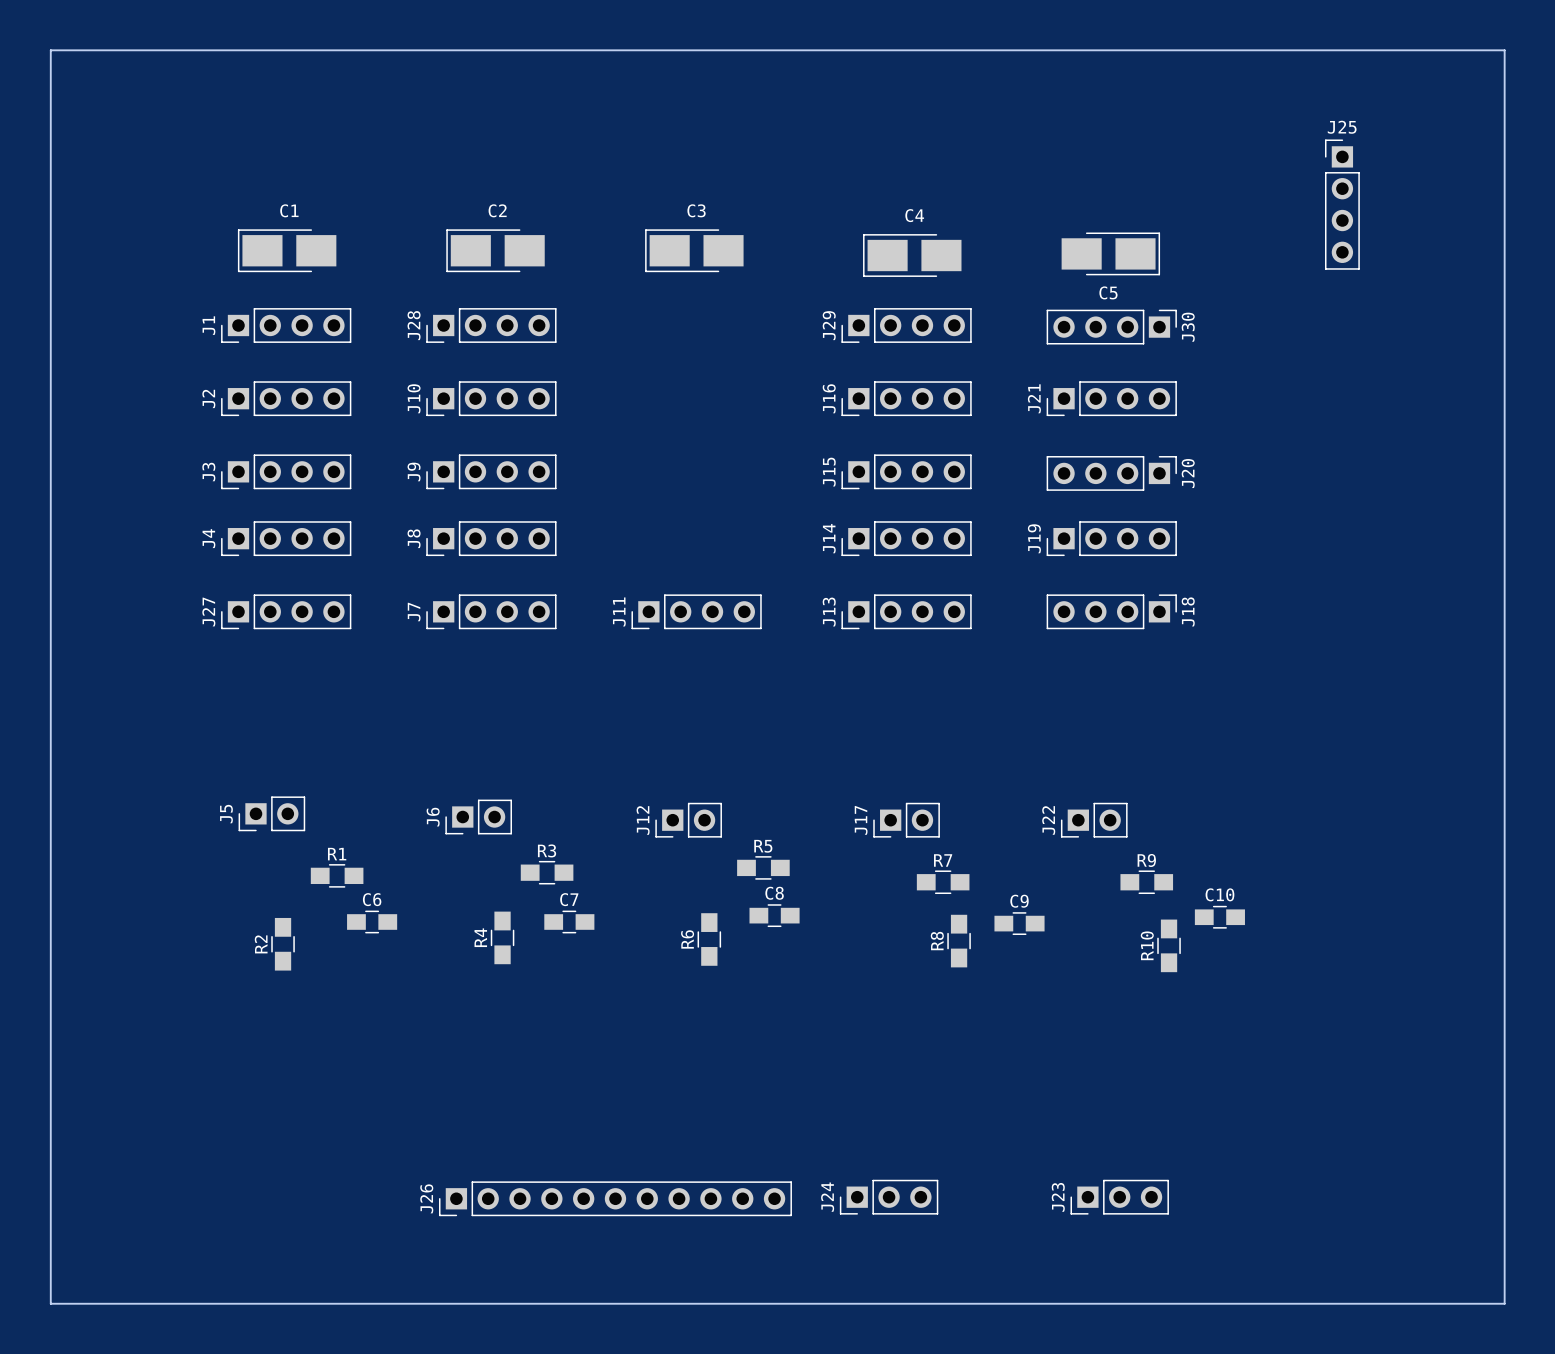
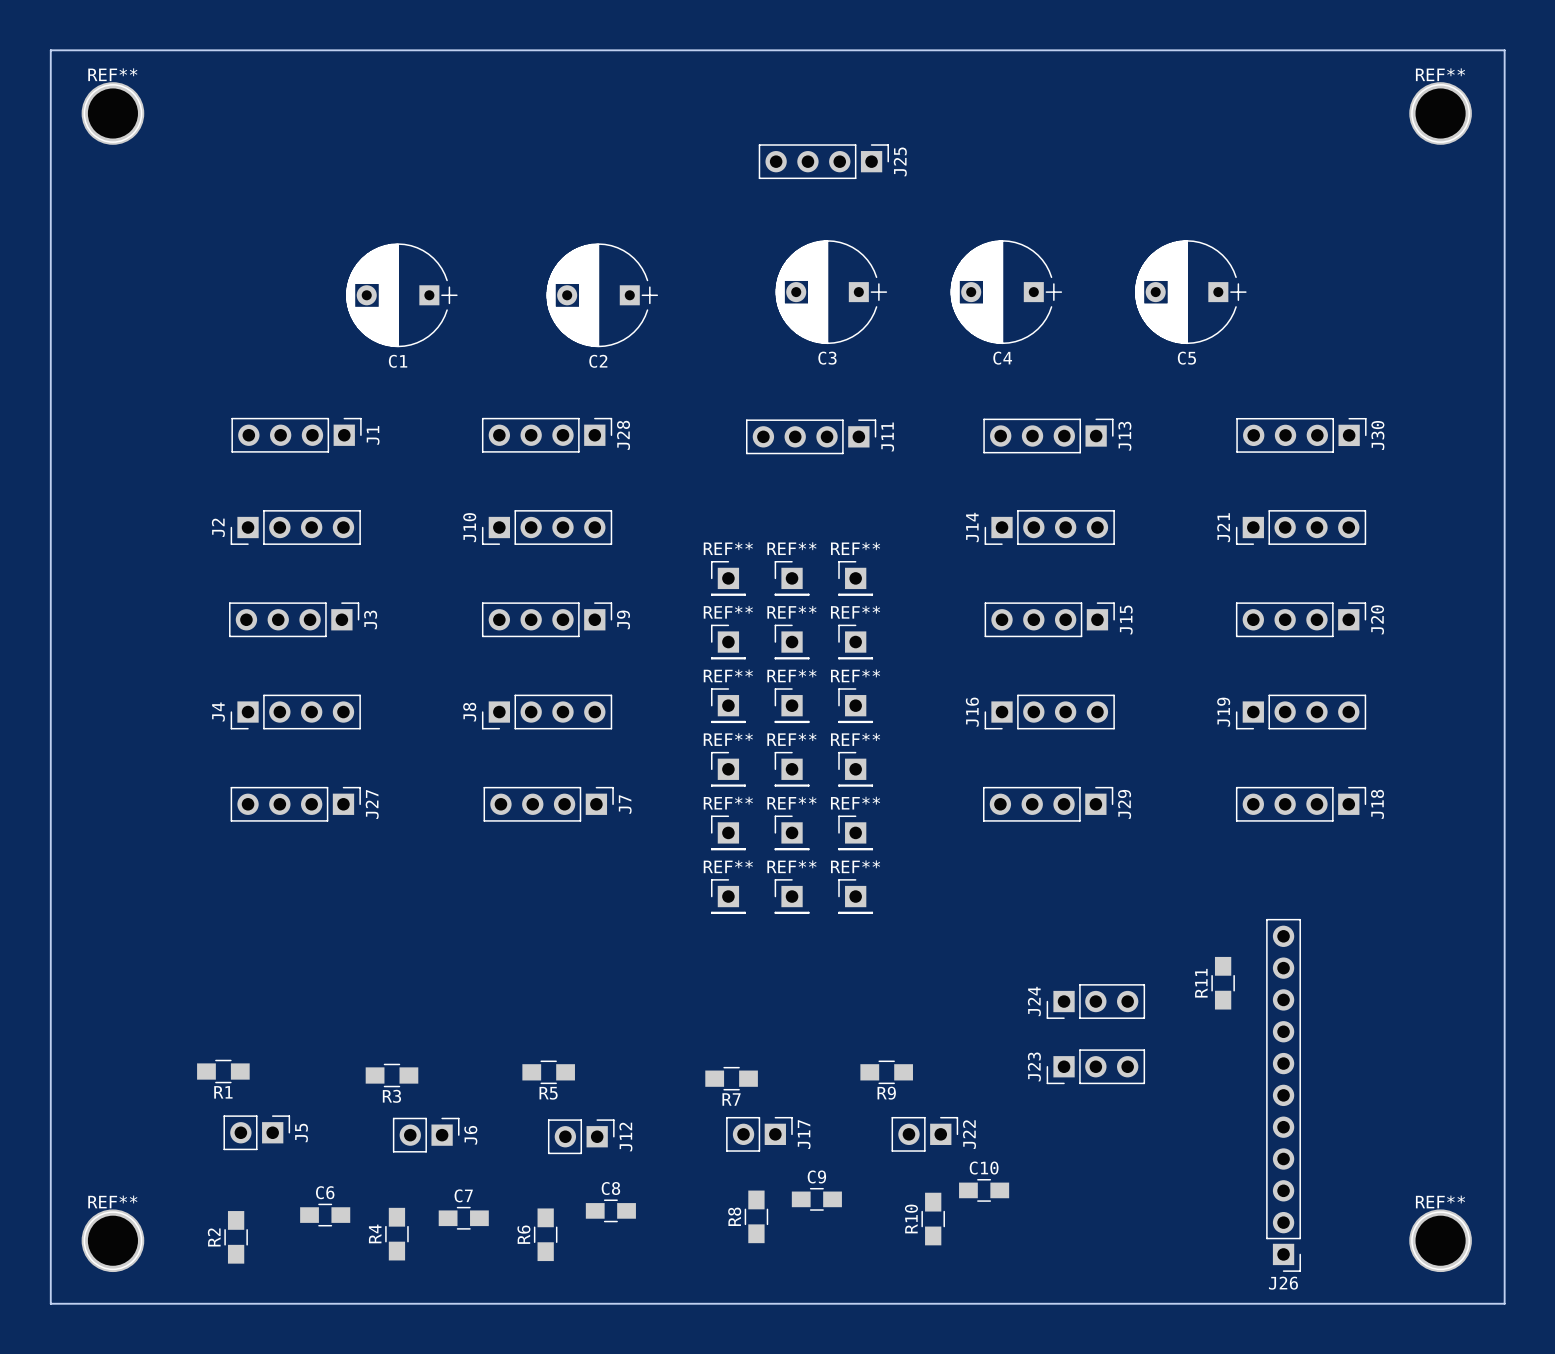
REF**: none -> (112, 113)
REF**: none -> (1440, 113)
J25 rotation: 0° (1342, 204) -> 90° clockwise (823, 161)
J25 position: (1342, 204) -> (823, 161)
C1 name position: C1 (289, 210) -> C1 (398, 361)
C2 name position: C2 (497, 210) -> C2 (598, 361)
C3 name position: C3 (696, 210) -> C3 (827, 358)
C4 name position: C4 (914, 215) -> C4 (1002, 358)
C1 footprint: [237, 229, 337, 273] -> [346, 243, 458, 348]
C2 footprint: [446, 229, 545, 273] -> [546, 243, 659, 348]
C3 footprint: [645, 229, 744, 273] -> [775, 240, 888, 345]
C5 footprint: [1061, 232, 1161, 276] -> [1135, 240, 1247, 345]
C4 footprint: [863, 234, 962, 277] -> [950, 240, 1063, 345]
C5 name position: C5 (1108, 292) -> C5 (1186, 358)
J1 rotation: 0° (286, 325) -> 180° (296, 435)
J1 position: (286, 325) -> (296, 435)
J28 rotation: 0° (491, 325) -> 180° (547, 435)
J28 position: (491, 325) -> (547, 435)
J29 rotation: 0° (906, 325) -> 180° (1048, 804)
J29 position: (906, 325) -> (1048, 804)
J30 position: (1111, 327) -> (1301, 435)
J2 position: (286, 398) -> (295, 527)
J10 position: (491, 398) -> (547, 527)
J16 position: (906, 398) -> (1049, 712)
J21 position: (1111, 398) -> (1301, 527)
J3 rotation: 0° (286, 471) -> 180° (294, 619)
J3 position: (286, 471) -> (294, 619)
J9 rotation: 0° (491, 471) -> 180° (547, 619)
J9 position: (491, 471) -> (547, 619)
J15 rotation: 0° (906, 471) -> 180° (1049, 619)
J15 position: (906, 471) -> (1049, 619)
J20 position: (1111, 473) -> (1301, 619)
J4 position: (286, 538) -> (295, 712)
J8 position: (491, 538) -> (547, 712)
J14 position: (906, 538) -> (1049, 527)
J19 position: (1111, 538) -> (1301, 712)
REF**: none -> (728, 578)
REF**: none -> (792, 578)
REF**: none -> (855, 578)
J27 rotation: 0° (286, 611) -> 180° (295, 804)
J27 position: (286, 611) -> (295, 804)
J7 rotation: 0° (491, 611) -> 180° (548, 804)
J7 position: (491, 611) -> (548, 804)
J11 rotation: 0° (696, 611) -> 180° (811, 436)
J11 position: (696, 611) -> (811, 436)
J13 rotation: 0° (906, 611) -> 180° (1048, 436)
J13 position: (906, 611) -> (1048, 436)
J18 position: (1111, 611) -> (1301, 804)
REF**: none -> (728, 642)
REF**: none -> (792, 642)
REF**: none -> (855, 642)
REF**: none -> (728, 705)
REF**: none -> (792, 705)
REF**: none -> (855, 705)
REF**: none -> (728, 769)
REF**: none -> (792, 769)
REF**: none -> (855, 769)
J5 rotation: 0° (271, 813) -> 180° (256, 1132)
J5 position: (271, 813) -> (256, 1132)
J6 rotation: 0° (478, 817) -> 180° (426, 1135)
J6 position: (478, 817) -> (426, 1135)
J12 rotation: 0° (688, 820) -> 180° (581, 1136)
J12 position: (688, 820) -> (581, 1136)
J17 rotation: 0° (906, 820) -> 180° (759, 1134)
J17 position: (906, 820) -> (759, 1134)
J22 rotation: 0° (1094, 820) -> 180° (924, 1134)
J22 position: (1094, 820) -> (924, 1134)
REF**: none -> (728, 832)
REF**: none -> (792, 832)
REF**: none -> (855, 832)
R5 name position: R5 (763, 846) -> R5 (548, 1093)
R3 name position: R3 (547, 850) -> R3 (391, 1096)
R1 name position: R1 (337, 854) -> R1 (223, 1092)
R7 name position: R7 (943, 860) -> R7 (731, 1099)
R9 name position: R9 (1146, 860) -> R9 (886, 1093)
R5 position: (763, 867) -> (548, 1072)
R3 position: (547, 872) -> (391, 1075)
R1 position: (337, 875) -> (223, 1071)
R7 position: (943, 882) -> (731, 1078)
R9 position: (1146, 882) -> (886, 1072)
REF**: none -> (728, 896)
REF**: none -> (792, 896)
REF**: none -> (855, 896)
C8 position: (774, 915) -> (610, 1210)
C10 position: (1219, 917) -> (984, 1190)
C6 position: (372, 922) -> (325, 1215)
C7 position: (569, 922) -> (463, 1218)
C9 position: (1019, 923) -> (816, 1199)
R4 position: (502, 937) -> (396, 1234)
R6 position: (709, 939) -> (545, 1234)
R8 position: (959, 941) -> (756, 1216)
R2 position: (283, 944) -> (236, 1237)
R10 position: (1169, 945) -> (933, 1219)
R11: none -> (1223, 983)
J24 position: (889, 1197) -> (1095, 1001)
J23 position: (1119, 1197) -> (1095, 1066)
J26 rotation: 0° (615, 1198) -> 90° counterclockwise (1283, 1095)
J26 position: (615, 1198) -> (1283, 1095)
REF**: none -> (112, 1240)
REF**: none -> (1440, 1240)

